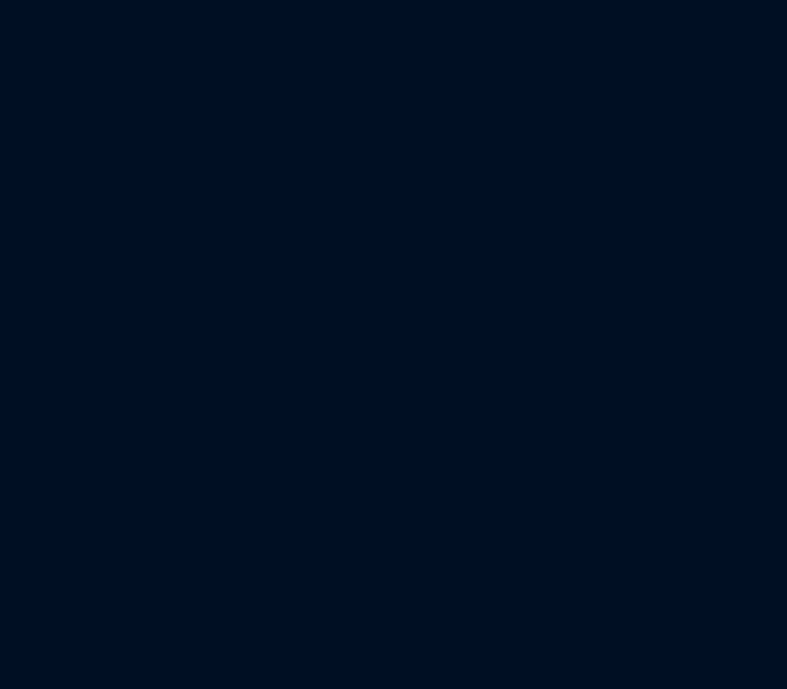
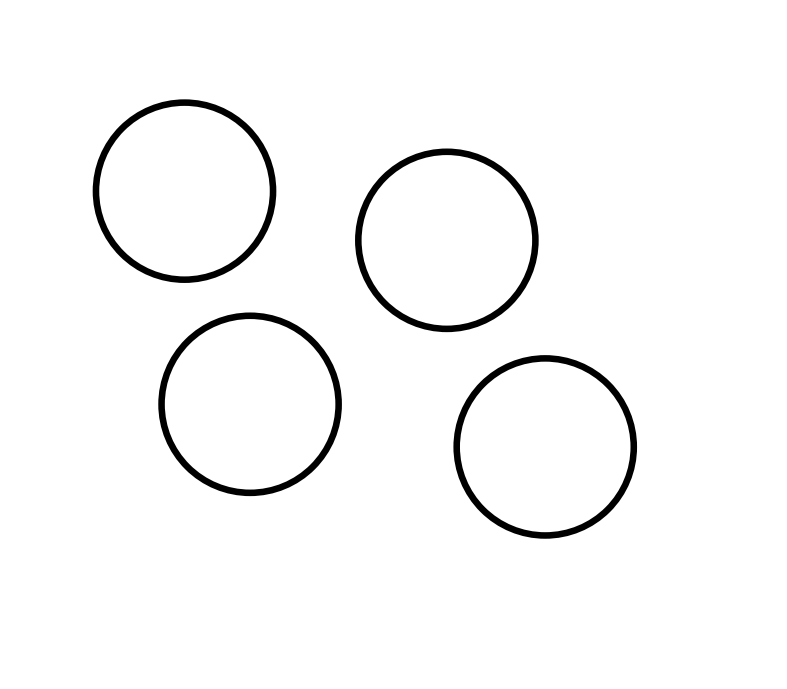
round board edge: none -> [92, 99, 277, 283]
round board edge: none -> [355, 148, 539, 333]
round board edge: none -> [158, 312, 342, 497]
round board edge: none -> [453, 355, 638, 539]

